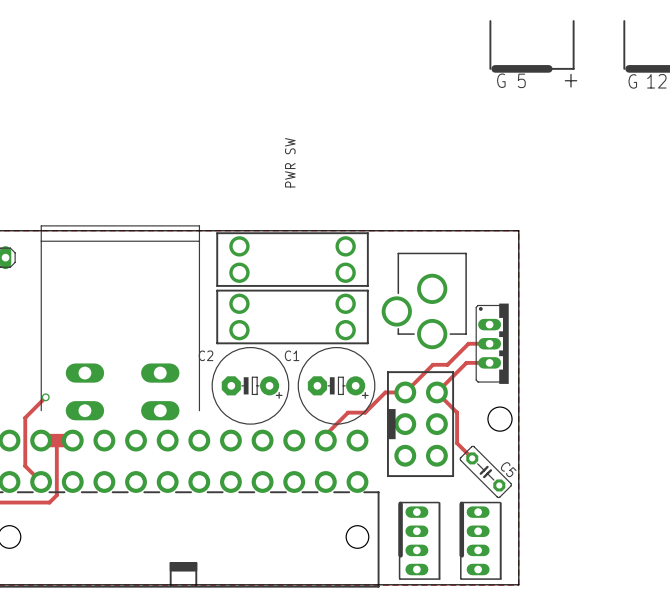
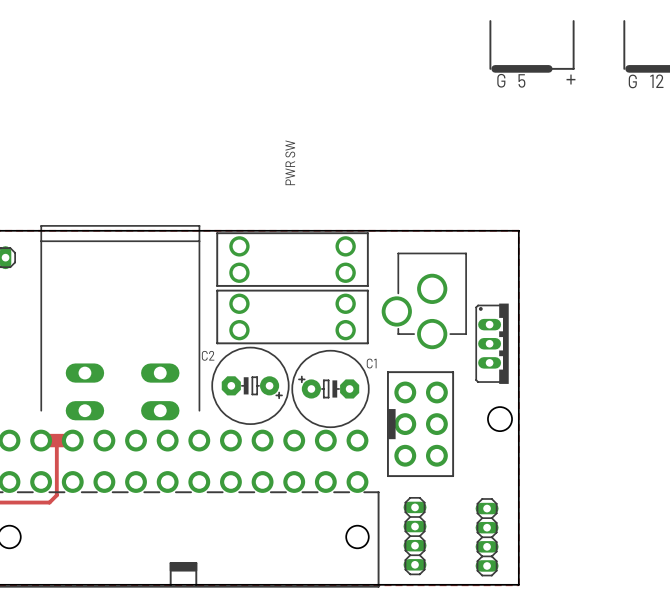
track: (489, 343) (468, 343) (447, 364) (432, 364) (405, 392) (385, 392) (365, 412) (348, 412) (325, 434) (325, 440) -> none
C1 name position: C1 (292, 355) -> C1 (371, 363)
track: (489, 362) (466, 362) (436, 392) (457, 412) (457, 443) (472, 458) -> none
C1 rotation: 0° (336, 385) -> 180° (330, 388)
track: (45, 397) (25, 417) (25, 466) (41, 482) -> none
via: (45, 397) -> none
C5: (485, 471) -> none
part footprint: [398, 501, 441, 580] -> [403, 497, 427, 575]
part footprint: [459, 501, 502, 580] -> [475, 498, 499, 577]

